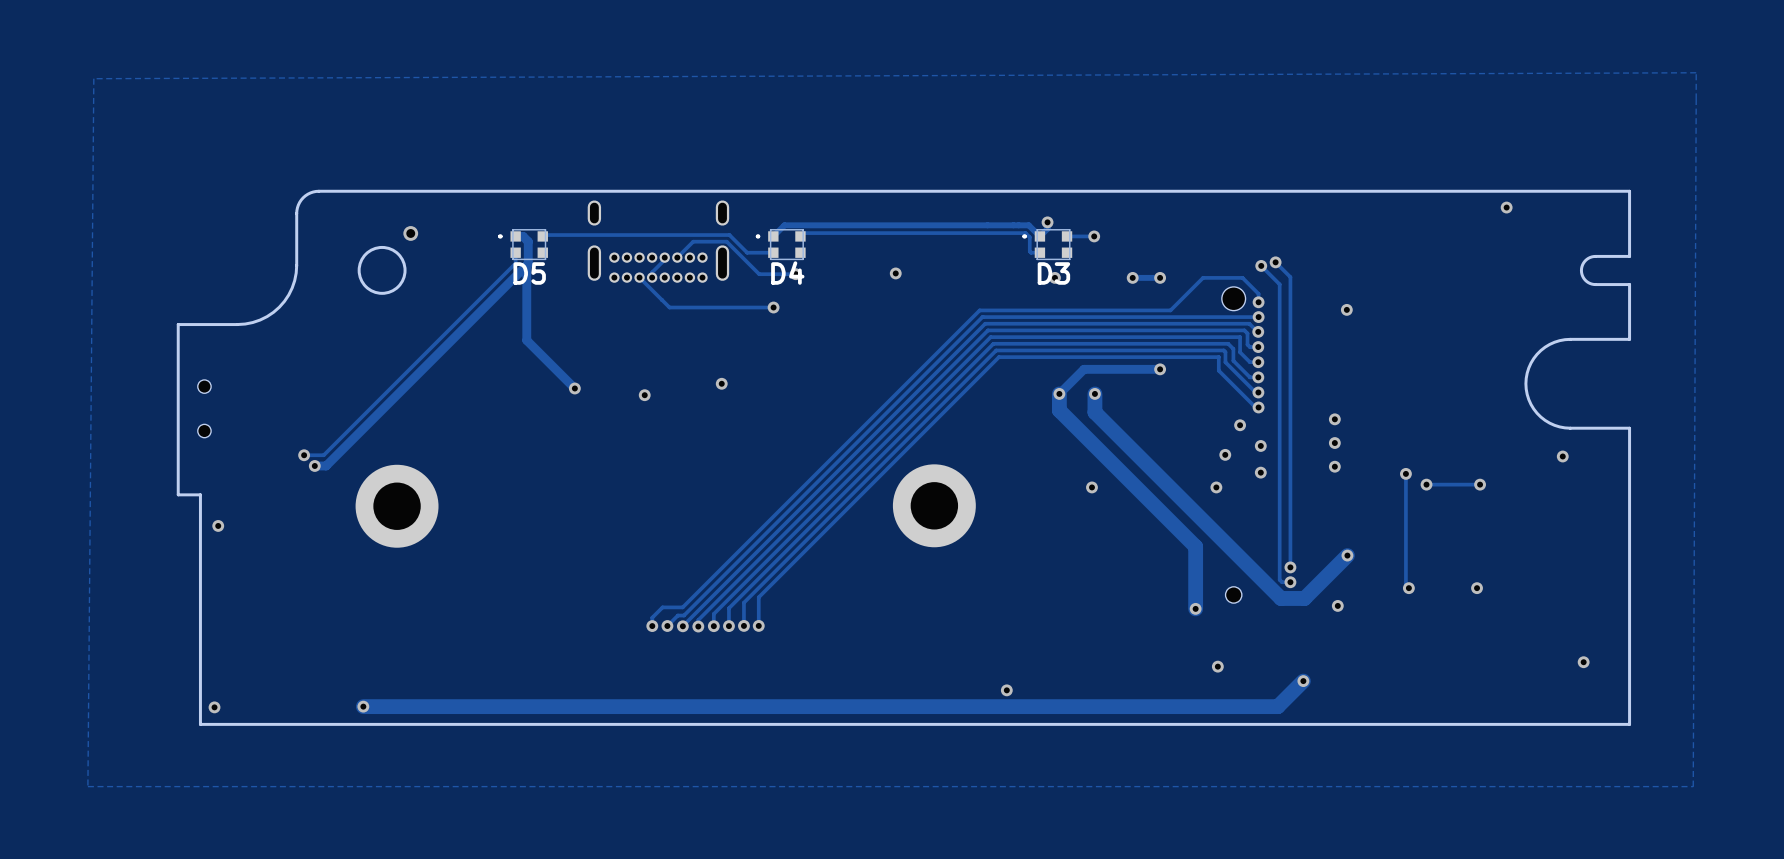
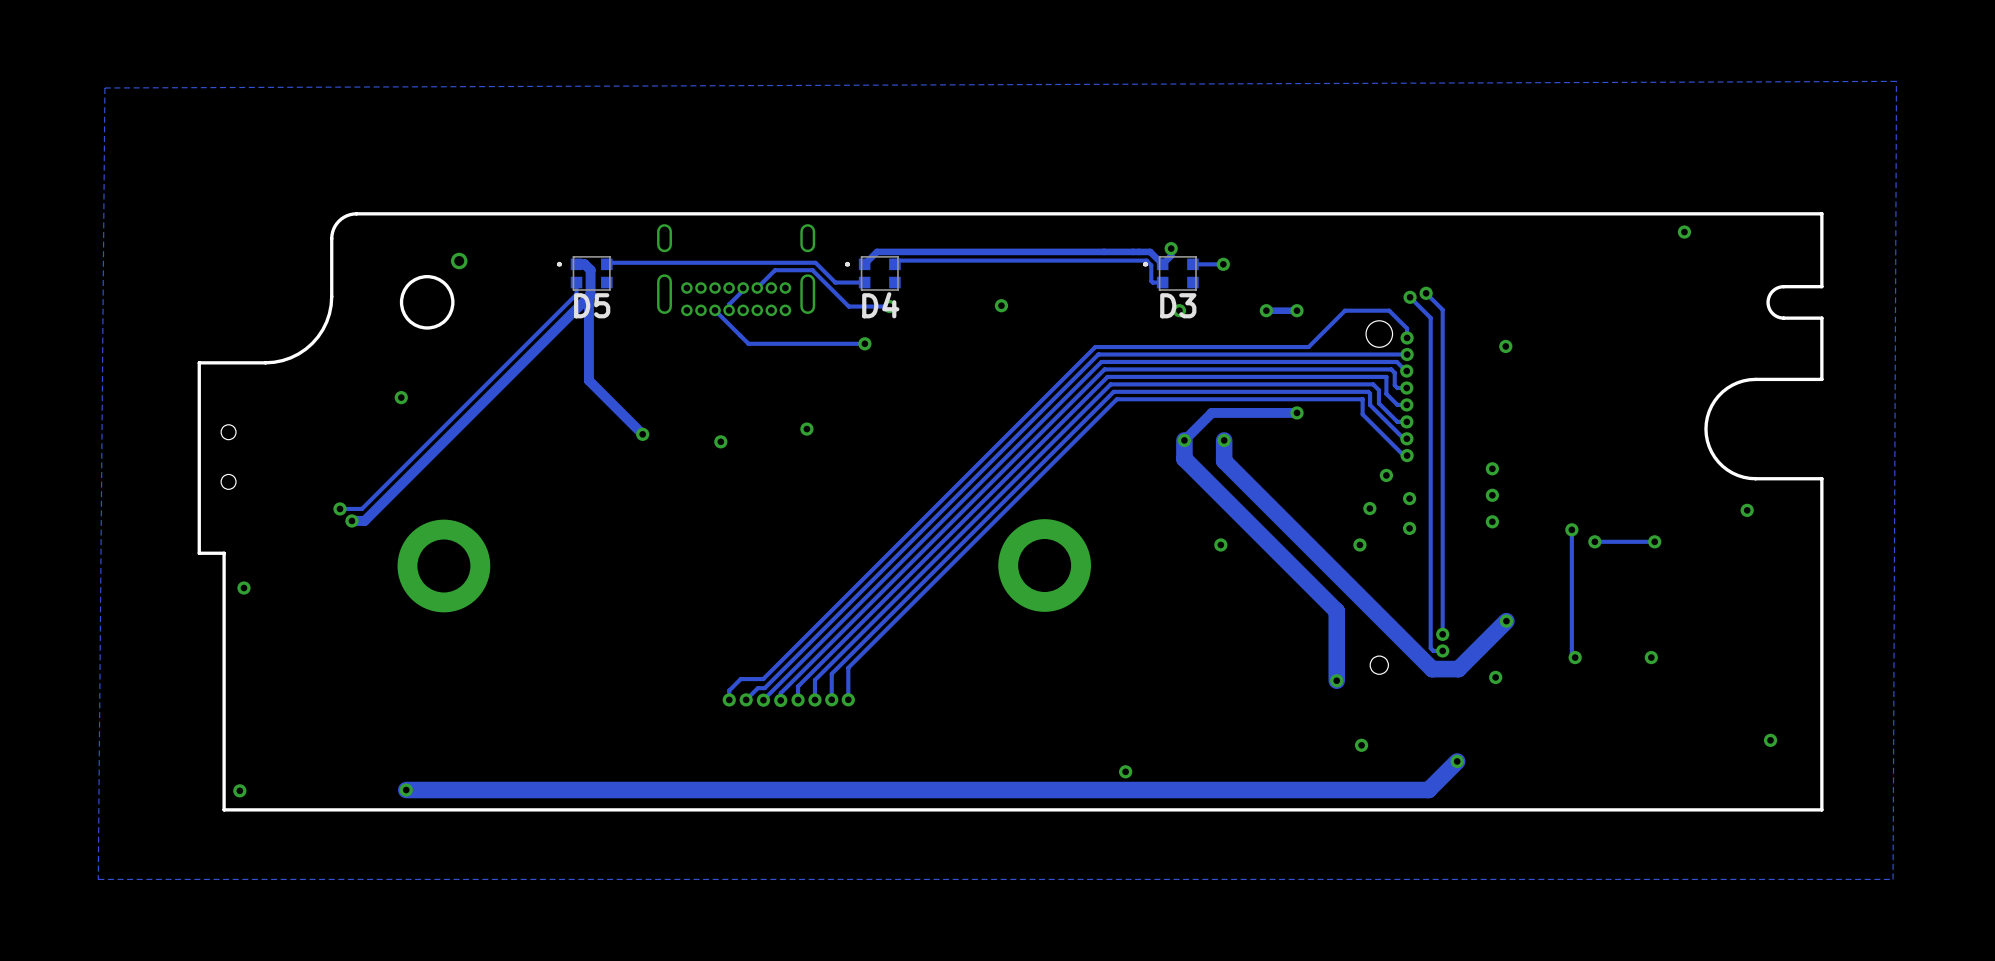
via: none -> (401, 397)

